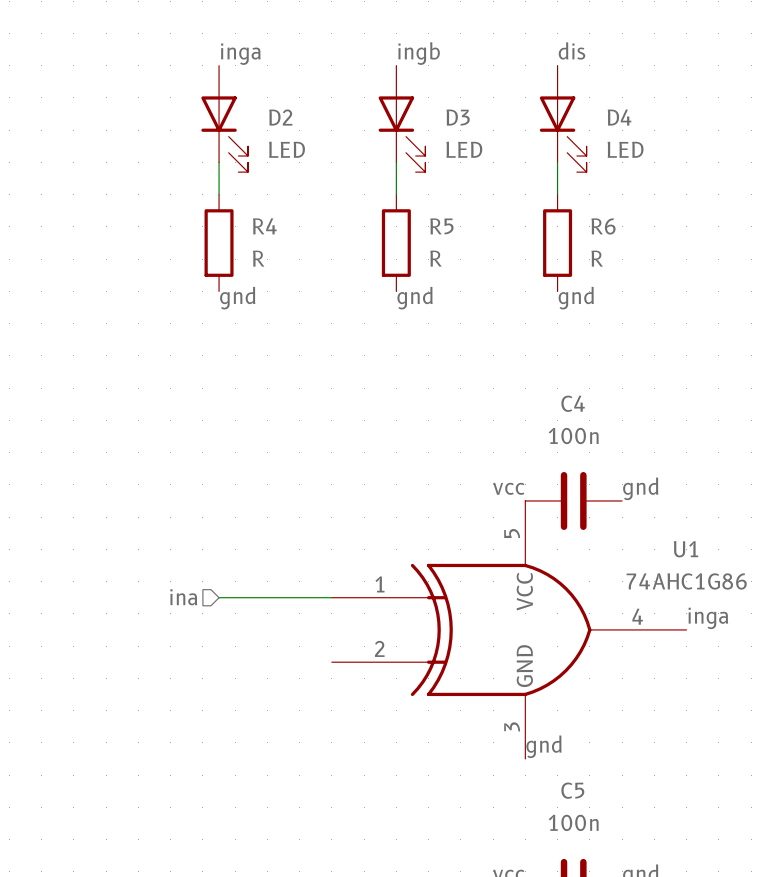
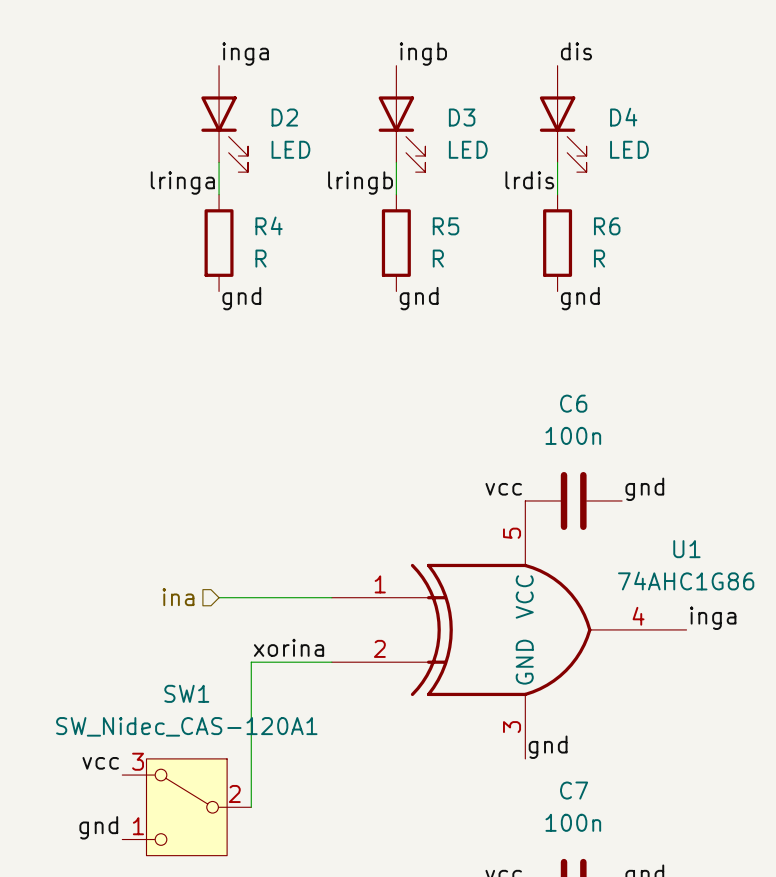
label: none -> lrdis (529, 180)
label: none -> lringa (182, 183)
label: none -> lringb (360, 183)
C4 name: C4 (573, 403) -> C6 (573, 403)
label: none -> xorina (289, 647)
wire: none -> (331, 662) (251, 662) (251, 807)
label: none -> vcc (100, 763)
C5 name: C5 (572, 790) -> C7 (574, 790)
SW1: none -> SW_Nidec_CAS-120A1 (186, 807)
label: none -> gnd (98, 827)

